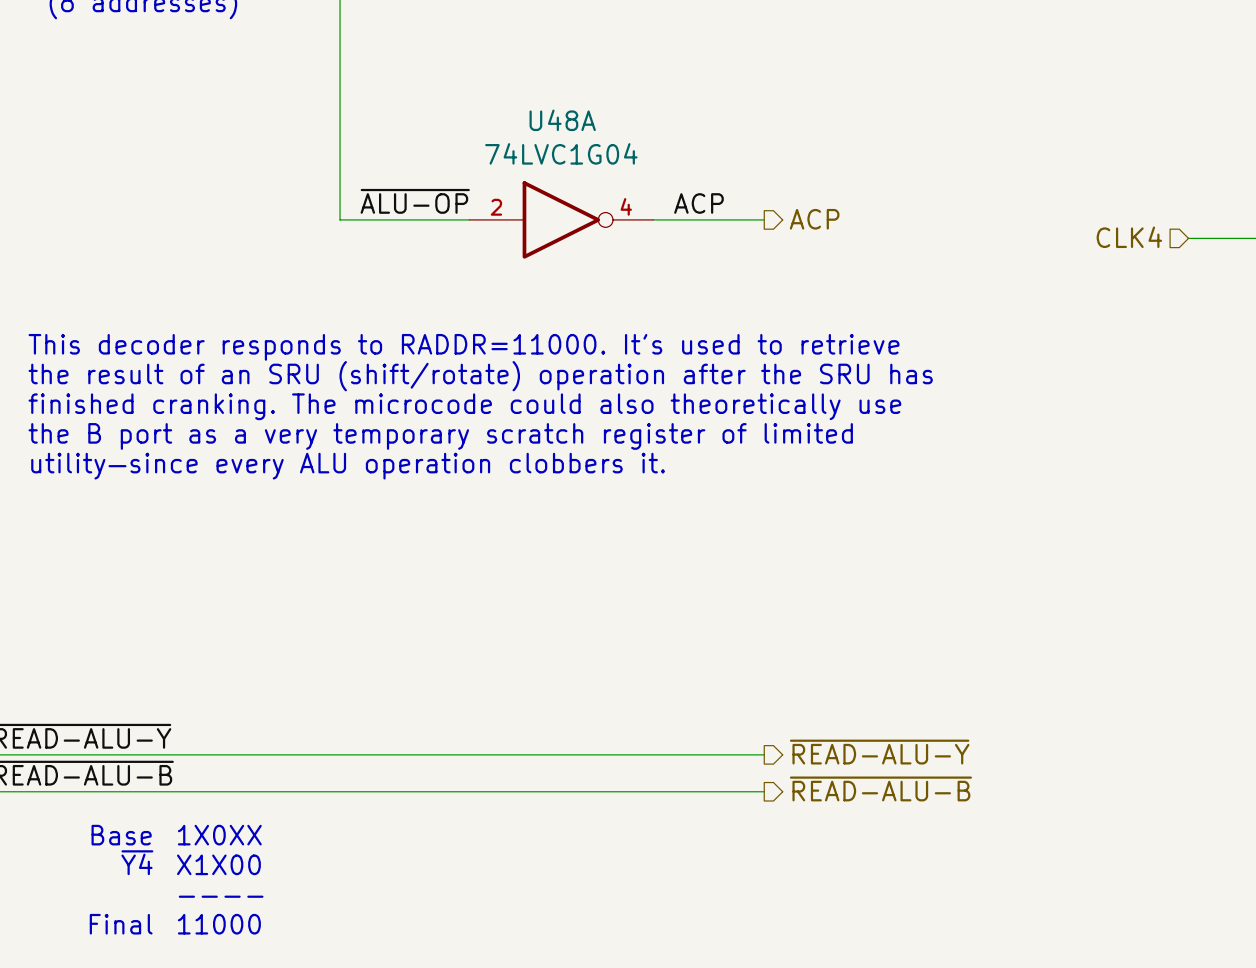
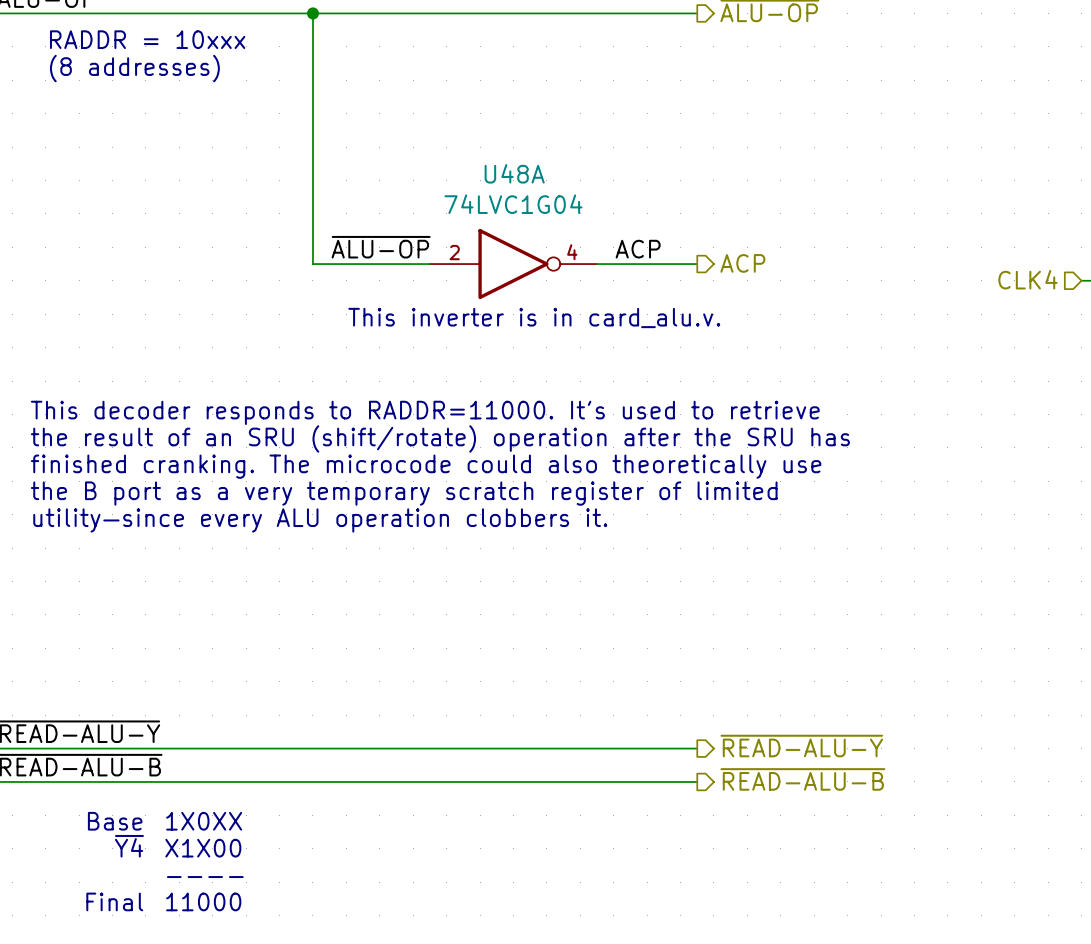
text: none -> This inverter is in card_alu.v. (534, 317)
text position: This decoder responds to RADDR=11000. It's used to retrieve (464, 347) -> This decoder responds to RADDR=11000. It's used to retrieve (425, 412)
text position: the result of an SRU (shift/rotate) operation after the SRU has (480, 376) -> the result of an SRU (shift/rotate) operation after the SRU has (440, 438)
text position: finished cranking. The microcode could also theoretically use (464, 406) -> finished cranking. The microcode could also theoretically use (426, 466)
text position: the B port as a very temporary scratch register of limited (440, 436) -> the B port as a very temporary scratch register of limited (404, 493)
text position: utility—since every ALU operation clobbers it. (348, 466) -> utility—since every ALU operation clobbers it. (320, 520)

